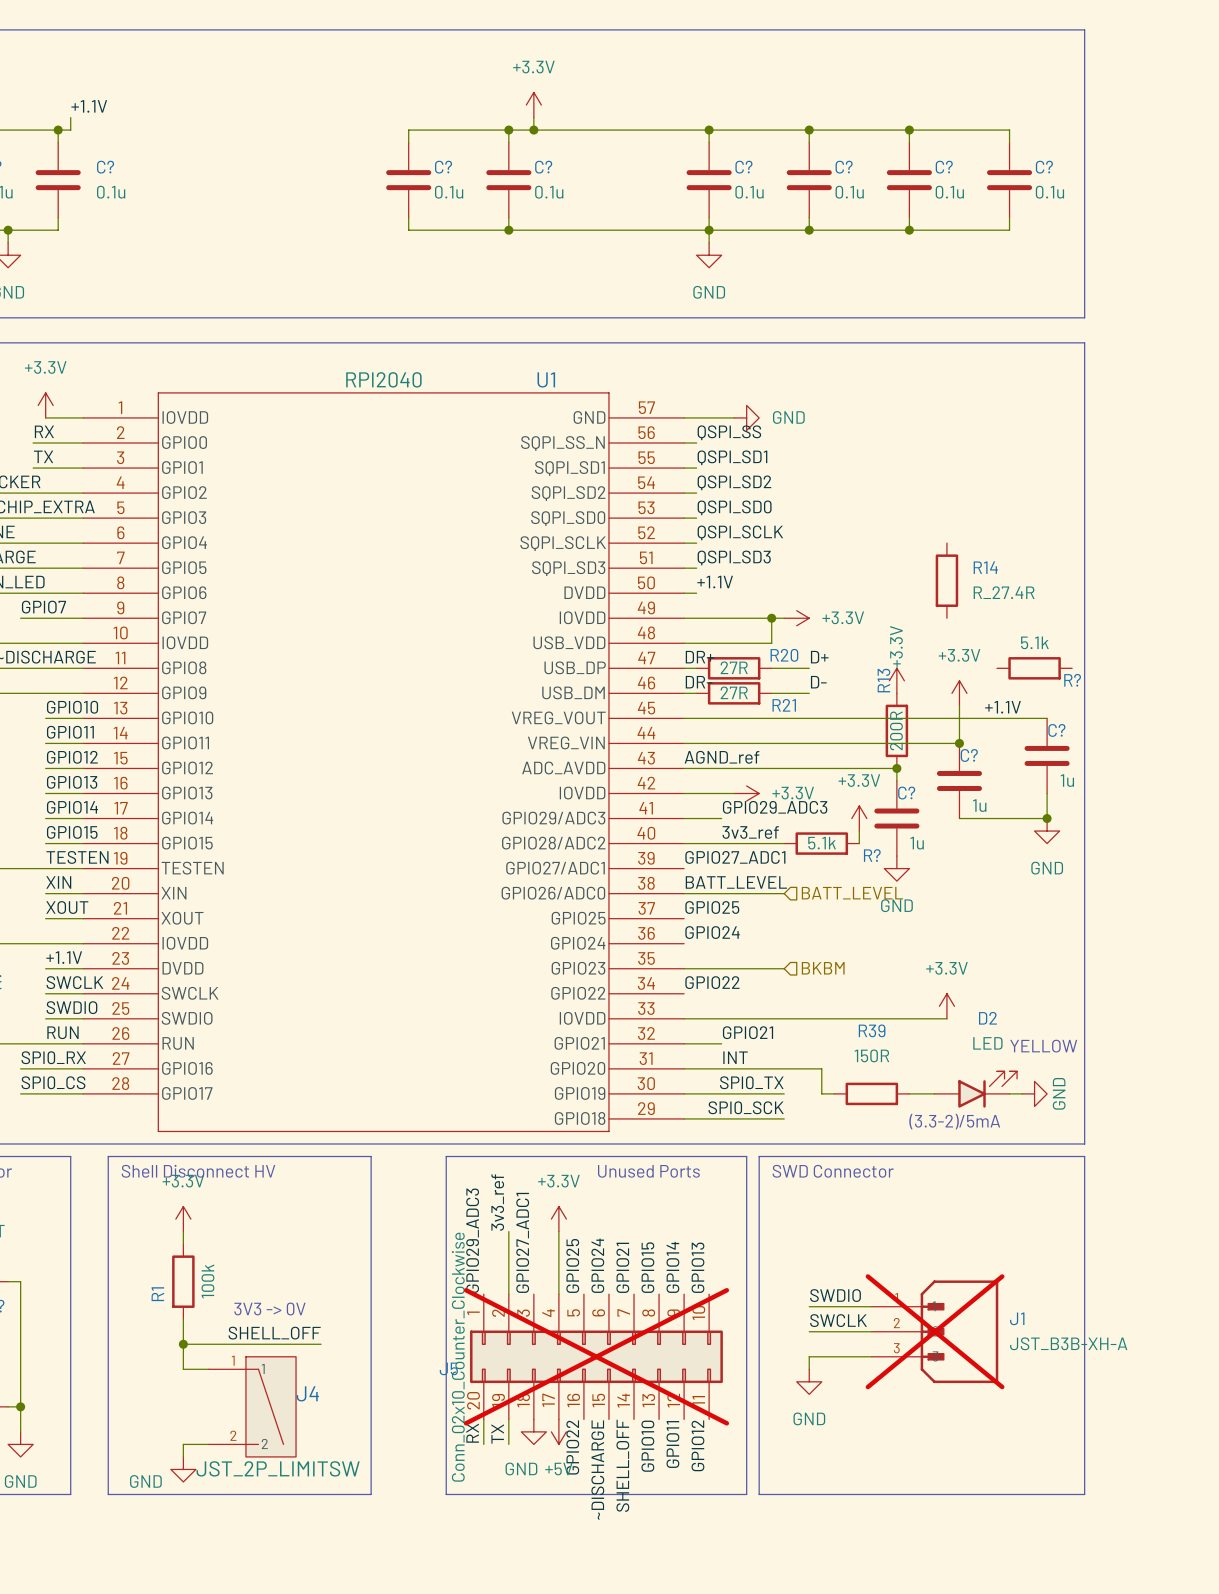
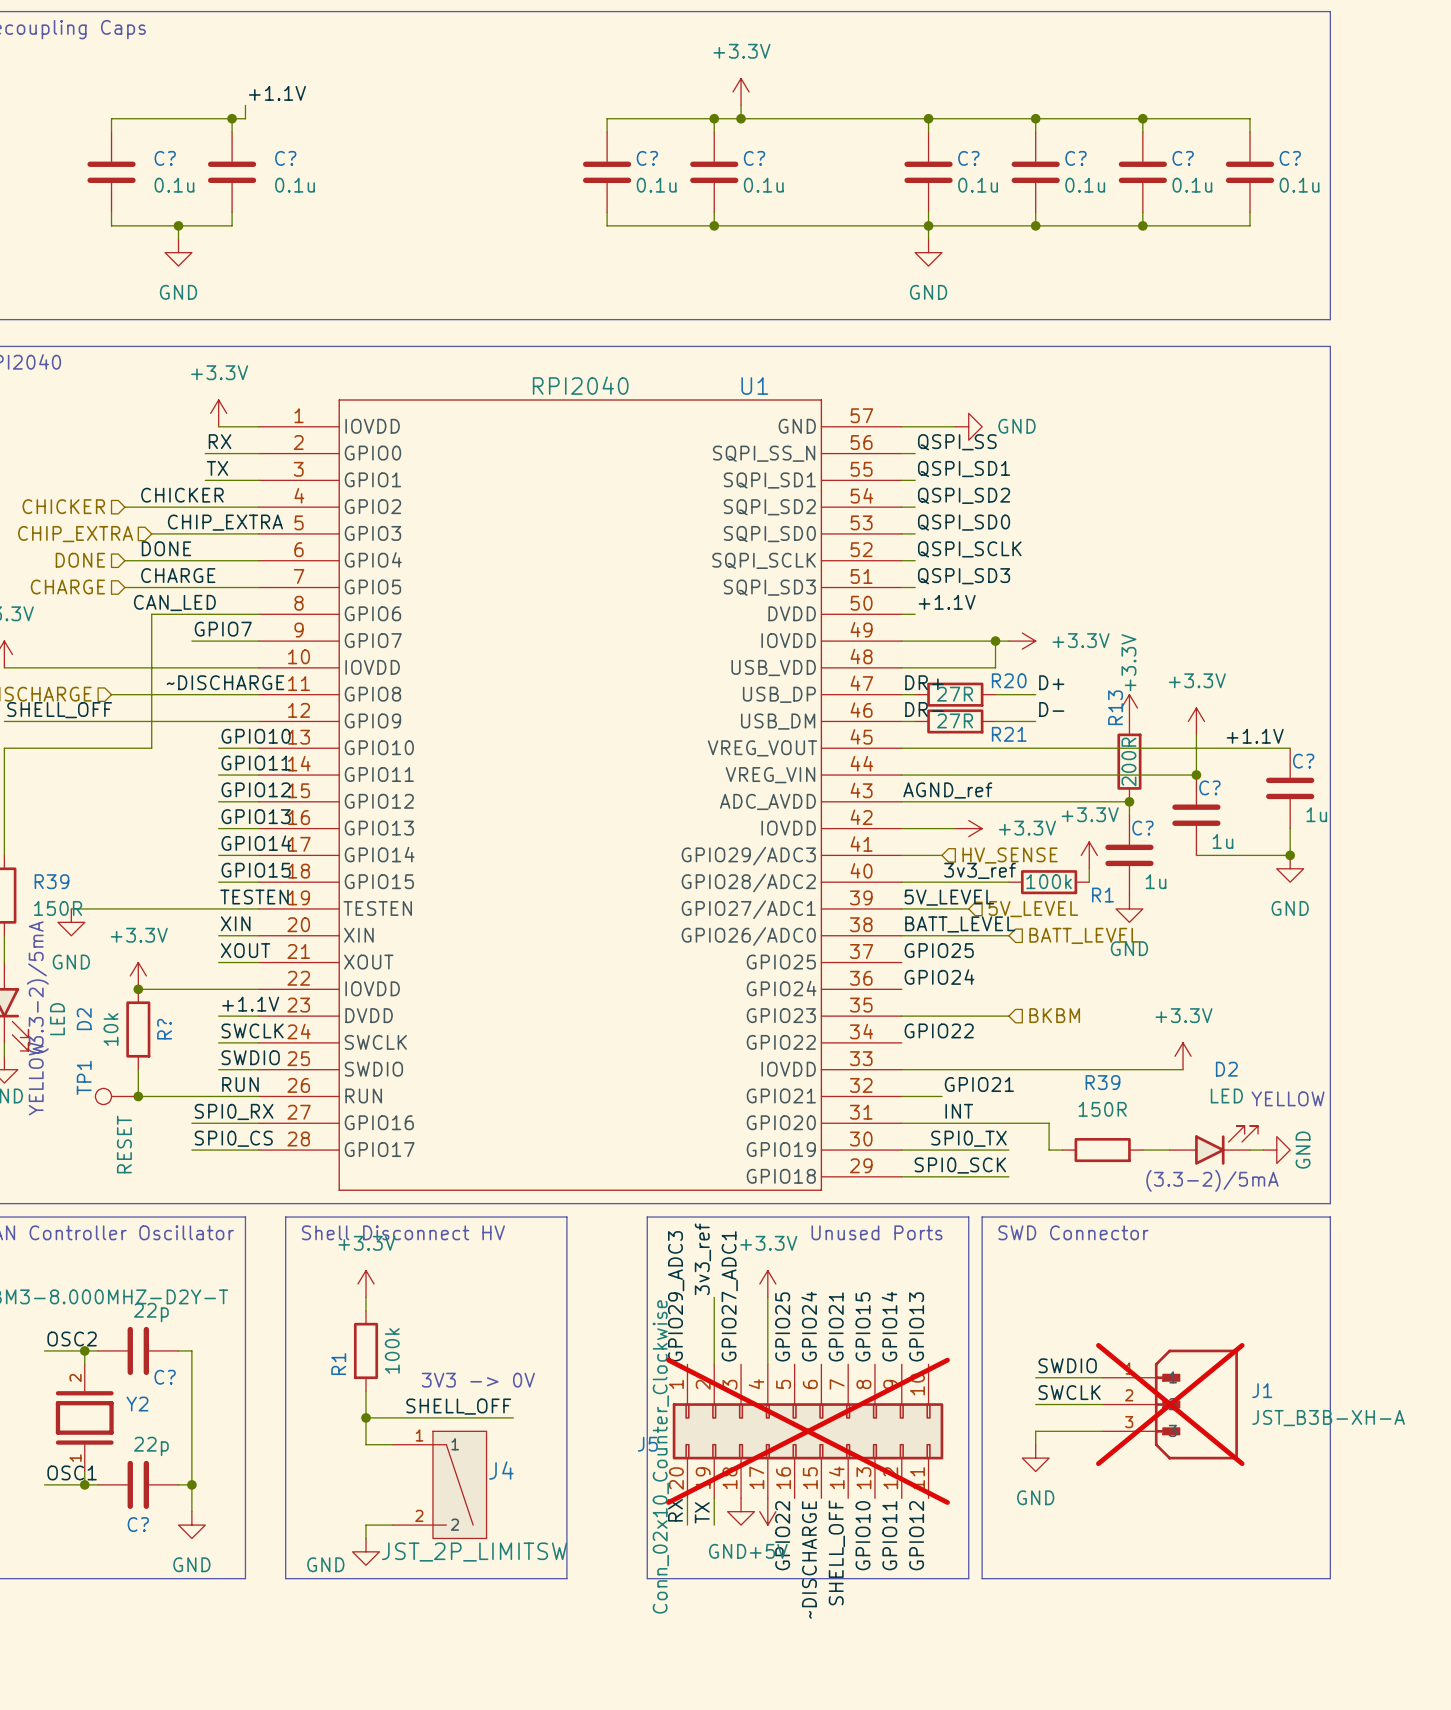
R14: R_27.4R (946, 580) -> none
R?: 5.1k (1034, 668) -> none
label: GPIO29_ADC3 (775, 807) -> none
hierarchical label: none -> HV_SENSE (1010, 855)
R? value: 5.1k (822, 843) -> 100k (1049, 881)
R? name: R? (872, 855) -> R1 (1102, 895)
label: GPIO27_ADC1 (735, 857) -> 5V_LEVEL (949, 897)
wire: none -> (901, 908) (968, 908)
hierarchical label: none -> 5V_LEVEL (1033, 909)

